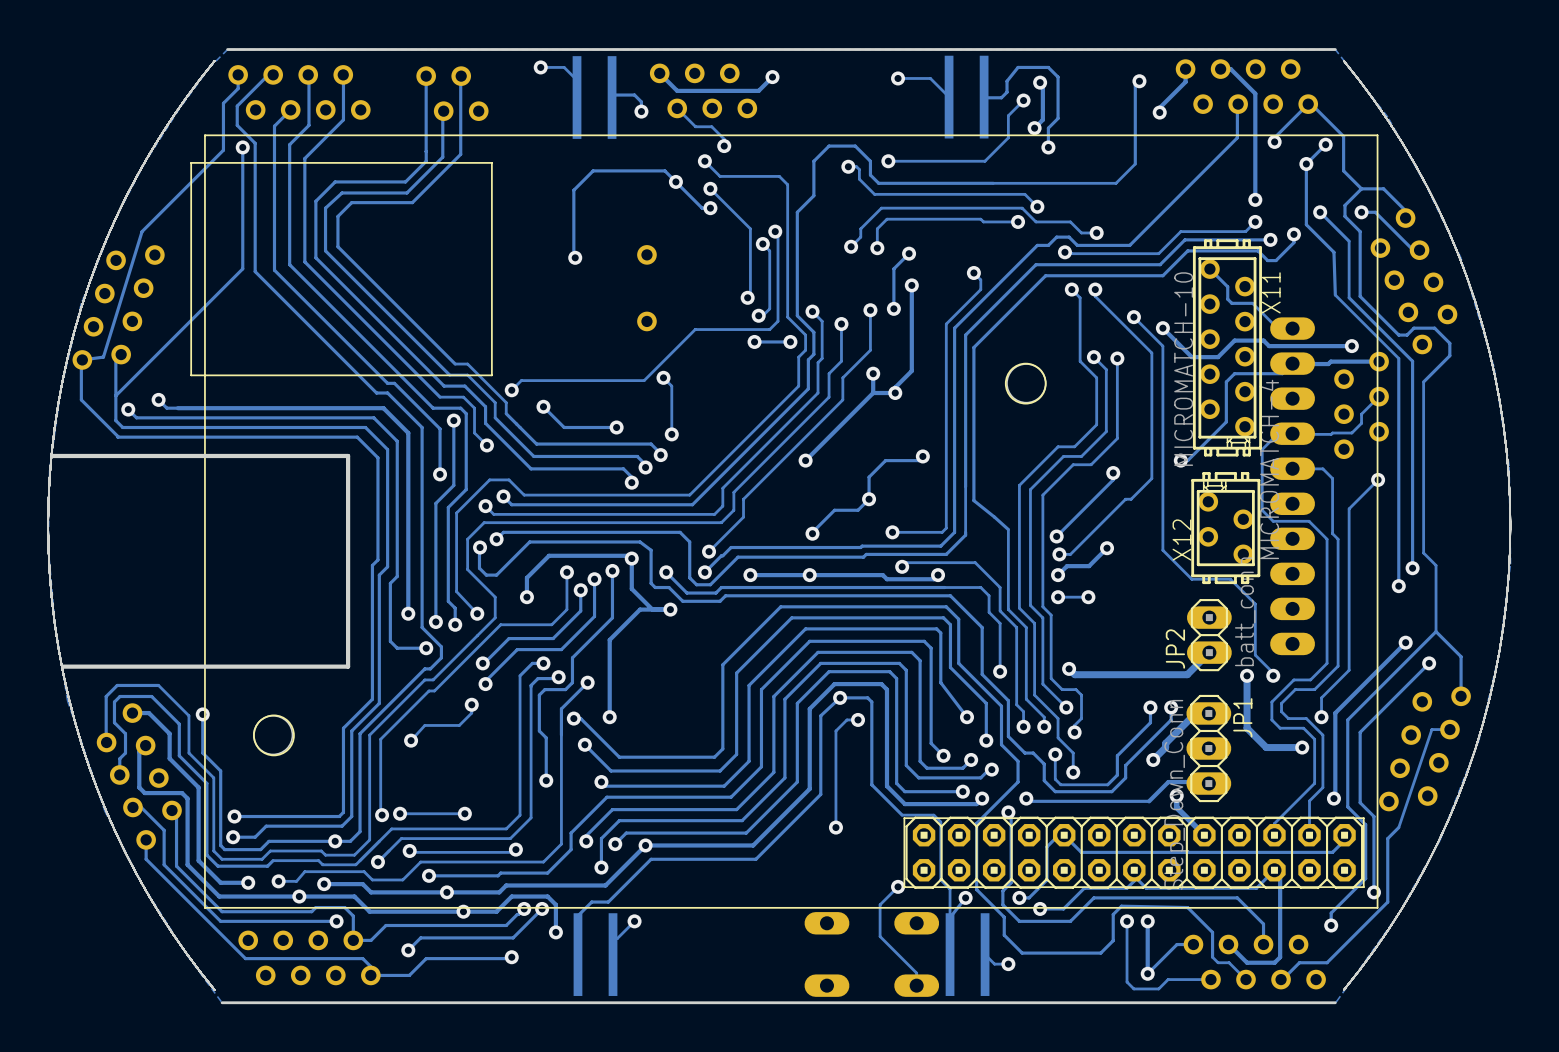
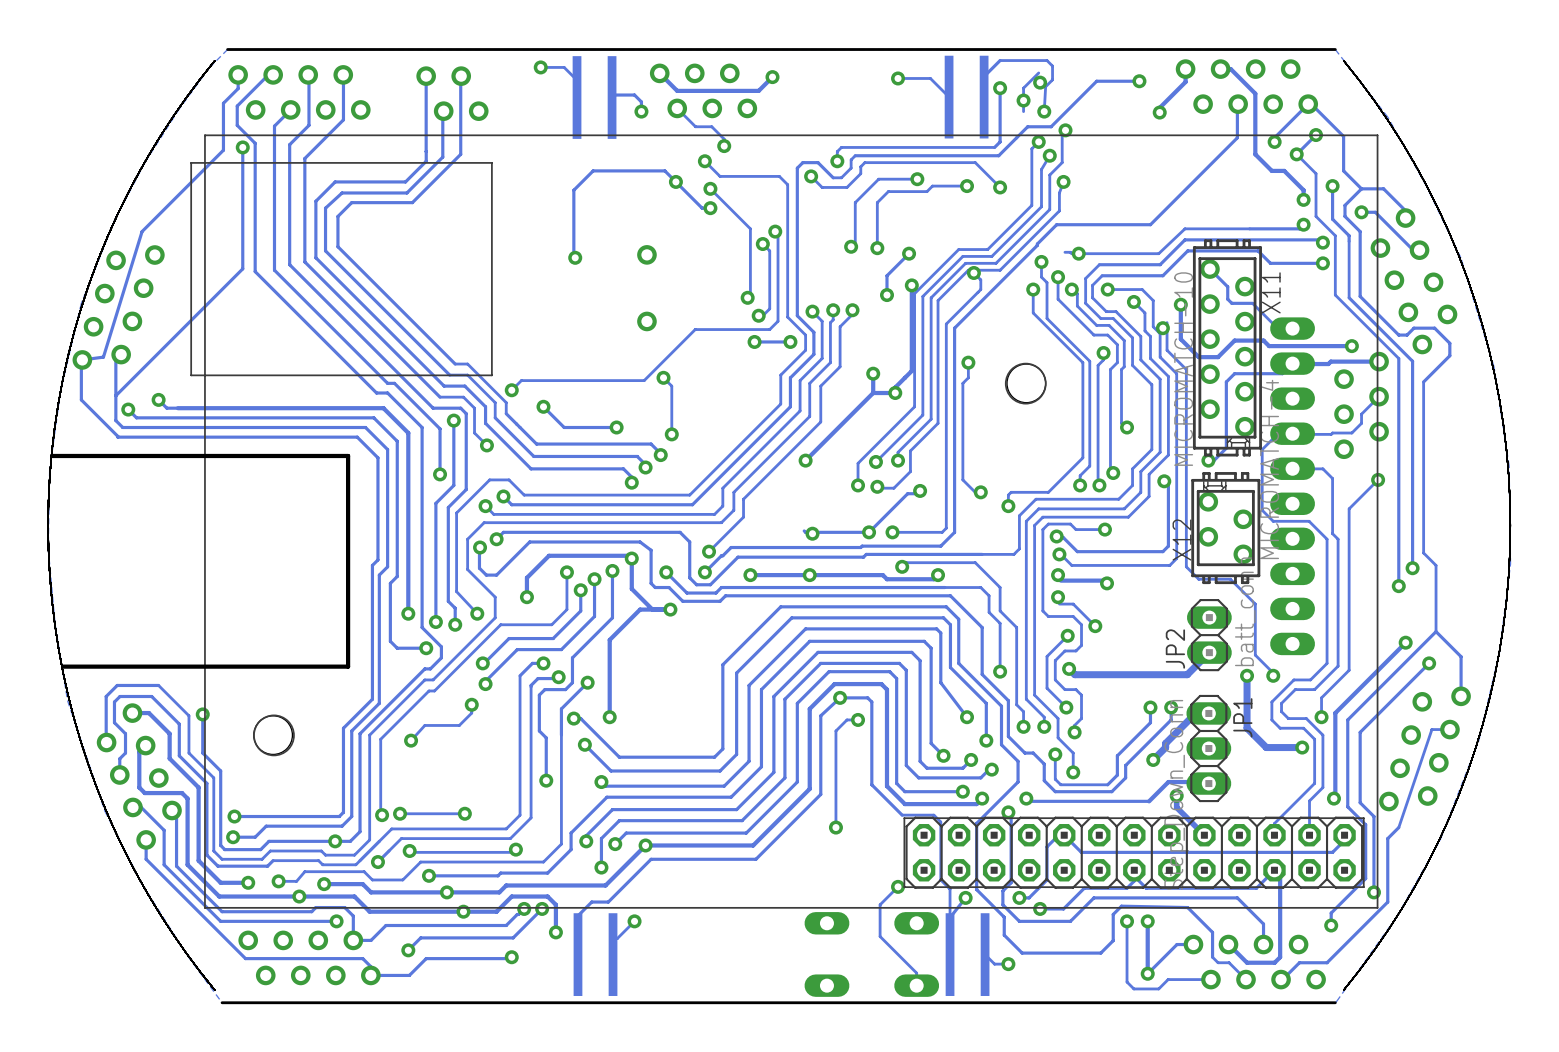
track: none -> (1038, 72) (1023, 88) (1023, 111)
track: (1139, 81) (1135, 85) (1135, 164) (1115, 183) (878, 183) (870, 175) (870, 161) (855, 146) (829, 146) (813, 161) (813, 195) (797, 212) -> (1139, 81) (1096, 81) (1051, 126) (1027, 126) (998, 155) (855, 155) (851, 159) (851, 168) (841, 177) (833, 177) (818, 162) (802, 162) (797, 168) (797, 212)
track: (1040, 82) (1042, 85) (1042, 119) (1034, 128) -> none
track: none -> (1000, 88) (1000, 141) (994, 147) (841, 147) (837, 151) (837, 161)
via: none -> (1000, 88)
track: (984, 97) (1001, 97) (1007, 92) (1007, 81) (1018, 67) (1048, 67) (1058, 77) (1058, 118) (1048, 128) (1048, 147) -> (984, 97) (984, 75) (1000, 60) (1047, 60) (1052, 66) (1052, 79) (1045, 86) (1044, 111)
track: (1023, 100) (1008, 115) (1008, 137) (984, 161) (888, 161) -> none
via: none -> (1044, 111)
via: (1034, 128) -> none
track: none -> (1065, 130) (1062, 133) (1062, 162) (1049, 175) (1049, 209) (995, 263) (965, 263) (931, 297) (931, 419) (898, 452) (898, 460)
via: none -> (1065, 130)
track: none -> (1038, 141) (1031, 148) (1031, 205) (987, 249) (958, 249) (914, 293) (914, 406) (858, 463) (858, 485)
via: none -> (1038, 141)
track: (1325, 144) (1306, 164) (1306, 224) (1333, 252) (1335, 295) -> (1316, 135) (1296, 154) (1316, 173) (1316, 216) (1335, 235) (1335, 295)
via position: (1325, 144) -> (1316, 135)
via: (1048, 147) -> none
track: (1255, 154) (1255, 199) -> (1255, 154) (1271, 170) (1284, 170) (1303, 190) (1303, 199)
track: none -> (1049, 155) (1041, 169) (1041, 206) (991, 256) (962, 256) (922, 296) (922, 415) (875, 461)
via: none -> (1049, 155)
via: (888, 161) -> none
via position: (1306, 164) -> (1296, 154)
track: (848, 166) (856, 166) (859, 169) (859, 179) (874, 194) (1024, 194) (1037, 206) -> none
via position: (848, 166) -> (837, 161)
track: none -> (811, 176) (822, 187) (846, 187) (860, 173) (860, 166) (864, 162) (975, 162) (1000, 187)
via: none -> (811, 176)
track: none -> (917, 179) (878, 179) (855, 202) (855, 242)
via: none -> (917, 179)
track: none -> (1063, 181) (1059, 192) (1059, 210) (1000, 270) (968, 270) (938, 300) (938, 423) (910, 450) (910, 471) (893, 488) (877, 486)
via: none -> (1063, 181)
via: none -> (967, 186)
via: none -> (1332, 186)
via: none -> (1000, 187)
via: (1255, 199) -> none
via: none -> (1303, 199)
via: (1037, 206) -> none
track: (1320, 212) (1349, 241) -> (1332, 186) (1332, 219) (1349, 235) (1349, 241)
via: (1320, 212) -> none
track: (1018, 221) (983, 221) (980, 219) (886, 219) (877, 228) -> (967, 186) (932, 186) (927, 191) (888, 191) (877, 202) (877, 228)
via: (1018, 221) -> none
track: (1255, 221) (1245, 231) (1180, 231) (1158, 253) -> (1303, 224) (1299, 228) (1184, 228) (1158, 253)
via: (1255, 221) -> none
track: (1150, 224) (1129, 245) (1077, 245) (1069, 237) (1056, 237) (1048, 245) (1037, 245) -> (1150, 224) (1056, 224) (1037, 245)
track: (1096, 232) (1081, 232) (1070, 221) (1035, 221) (1022, 208) (881, 208) (860, 228) (860, 237) (851, 246) -> none
via: (1096, 232) -> none
track: (1293, 234) (1293, 242) (1276, 260) (1267, 260) -> (1322, 263) (1270, 263) (1267, 260)
via position: (1293, 234) -> (1303, 224)
track: none -> (1270, 239) (1320, 239) (1322, 242)
via: (1270, 239) -> none
via: none -> (1322, 242)
via: (1064, 252) -> none
via: none -> (1078, 253)
track: none -> (1041, 261) (1041, 277) (1047, 282) (1047, 318) (1089, 361) (1089, 466) (1080, 475) (1080, 485)
via: none -> (1041, 261)
via: none -> (1322, 263)
track: (1099, 264) (1035, 264) (965, 335) (965, 535) (946, 554) -> none
track: (893, 268) (893, 308) -> (893, 268) (886, 275) (886, 295)
track: (1102, 275) (1045, 275) (973, 347) (973, 500) (1008, 529) (1008, 609) (1026, 627) -> (1102, 275) (1092, 285) (1092, 297) (1106, 311) (1115, 311) (1140, 336) (1140, 359) (1160, 379) (1160, 452) (1140, 471) (1140, 492) (1124, 508) (1038, 508) (1026, 521) (1026, 627)
track: none -> (1058, 277) (1058, 299) (1093, 335) (1107, 335) (1117, 344) (1117, 358)
via: none -> (1058, 277)
track: none -> (1033, 289) (1033, 312) (1082, 362) (1082, 457) (1048, 492) (1011, 492) (1008, 495) (1008, 506)
via: none -> (1033, 289)
track: (1071, 289) (1080, 297) (1080, 361) (1096, 377) (1096, 424) (1074, 446) (1058, 446) (1019, 485) (1019, 515) -> none
track: none -> (1073, 289) (1077, 293) (1077, 306) (1096, 325) (1109, 325) (1124, 340) (1124, 366) (1121, 369) (1121, 423) (1127, 427)
track: (1095, 289) (1095, 296) (1151, 353) (1151, 384) -> (1099, 264) (1085, 278) (1085, 303) (1100, 318) (1113, 318) (1132, 337) (1132, 365) (1151, 384)
via position: (1095, 289) -> (1107, 289)
track: none -> (1107, 289) (1142, 289) (1153, 300) (1153, 326) (1160, 333) (1160, 357) (1176, 373) (1176, 558) (1169, 565) (1071, 565) (1060, 554) (1062, 557)
via: none -> (886, 295)
track: none -> (1133, 301) (1144, 312) (1144, 330) (1150, 336) (1150, 358) (1168, 376) (1168, 455) (1149, 474) (1149, 496) (1128, 517) (1042, 517) (1034, 525) (1034, 623)
via: none -> (1180, 304)
via: (893, 308) -> none
via: none -> (833, 310)
via: none -> (852, 310)
track: (870, 310) (870, 350) (842, 377) (842, 399) (820, 421) -> (852, 310) (852, 314) (840, 326) (840, 366) (820, 386) (820, 421)
via: (870, 310) -> none
track: (1133, 317) (1162, 346) (1162, 550) (1191, 579) (1198, 579) -> (1167, 322) (1167, 350) (1186, 369) (1186, 566) (1198, 579)
via position: (1133, 317) -> (1133, 301)
track: (841, 324) (841, 361) (829, 373) (829, 397) (809, 416) -> (833, 310) (833, 319) (830, 322) (830, 362) (809, 383) (809, 416)
via: (841, 324) -> none
track: (1162, 328) (1191, 357) (1198, 357) -> (1180, 304) (1180, 339) (1198, 357)
track: none -> (1103, 353) (1103, 359) (1098, 365) (1099, 485)
via: none -> (1103, 353)
track: (798, 357) (798, 386) (780, 404) -> (798, 357) (780, 375) (780, 404)
track: (1093, 357) (1106, 369) (1106, 431) (1081, 456) (1063, 456) (1030, 489) (1030, 605) (1042, 617) (1042, 684) (1047, 688) -> (1067, 635) (1047, 656) (1047, 688)
via: (1093, 357) -> none
via: (1117, 358) -> none
track: (808, 359) (808, 388) (790, 406) -> (808, 359) (790, 377) (790, 406)
track: (818, 362) (818, 393) (800, 410) -> (818, 362) (800, 380) (800, 410)
track: none -> (968, 362) (968, 377) (962, 383) (962, 479) (975, 492) (980, 492)
via: none -> (968, 362)
track: (1117, 362) (1117, 438) (1091, 464) (1073, 464) (1042, 495) (1042, 529) -> (1117, 362) (1110, 369) (1110, 470)
track: (1226, 421) (1187, 460) (1180, 460) -> (1226, 421) (1226, 448) (1213, 460) (1208, 460)
via: none -> (1127, 427)
track: (1151, 449) (1151, 478) (1131, 499) (1125, 499) (1070, 554) (1059, 554) -> (1151, 449) (1132, 468) (1132, 485) (1118, 499) (1035, 499) (1019, 515)
track: (922, 456) (918, 460) (885, 460) (869, 477) (869, 499) (858, 510) (834, 510) (812, 533) -> none
via: (922, 456) -> none
via: none -> (898, 460)
via: (1180, 460) -> none
via: none -> (1208, 460)
via: none -> (875, 461)
track: (1113, 473) (1113, 479) (1056, 536) -> none
track: none -> (1164, 481) (1168, 485) (1168, 546) (1162, 551) (1077, 551) (1062, 537)
via: none -> (1164, 481)
via: none -> (858, 485)
via: none -> (1080, 485)
via: none -> (1099, 485)
via: none -> (877, 486)
track: none -> (920, 490) (917, 493) (907, 493) (869, 532) (804, 530)
via: none -> (920, 490)
via: none -> (980, 492)
via: (869, 499) -> none
via: none -> (1008, 506)
track: none -> (1104, 529) (1075, 529) (1070, 524) (1048, 524) (1042, 529)
via: none -> (1104, 529)
via: none -> (869, 532)
track: (1019, 548) (1019, 608) (1034, 623) -> (1019, 548) (1013, 554) (946, 554)
track: (1107, 548) (1089, 566) (1067, 566) (1058, 575) -> none
via: (1107, 548) -> none
track: none -> (1060, 580) (1104, 580) (1107, 583)
via: none -> (1107, 583)
track: (1088, 597) (1058, 597) -> none
via: (1088, 597) -> none
track: none -> (1059, 604) (1073, 604) (1095, 626)
track: (1042, 606) (1051, 615) (1051, 678) (1062, 689) (1064, 689) -> (1042, 606) (1042, 610) (1048, 616) (1073, 616) (1081, 624) (1081, 645) (1075, 650) (1064, 650) (1055, 660) (1055, 679) (1064, 689)
via: none -> (1095, 626)
via: none -> (1067, 635)

